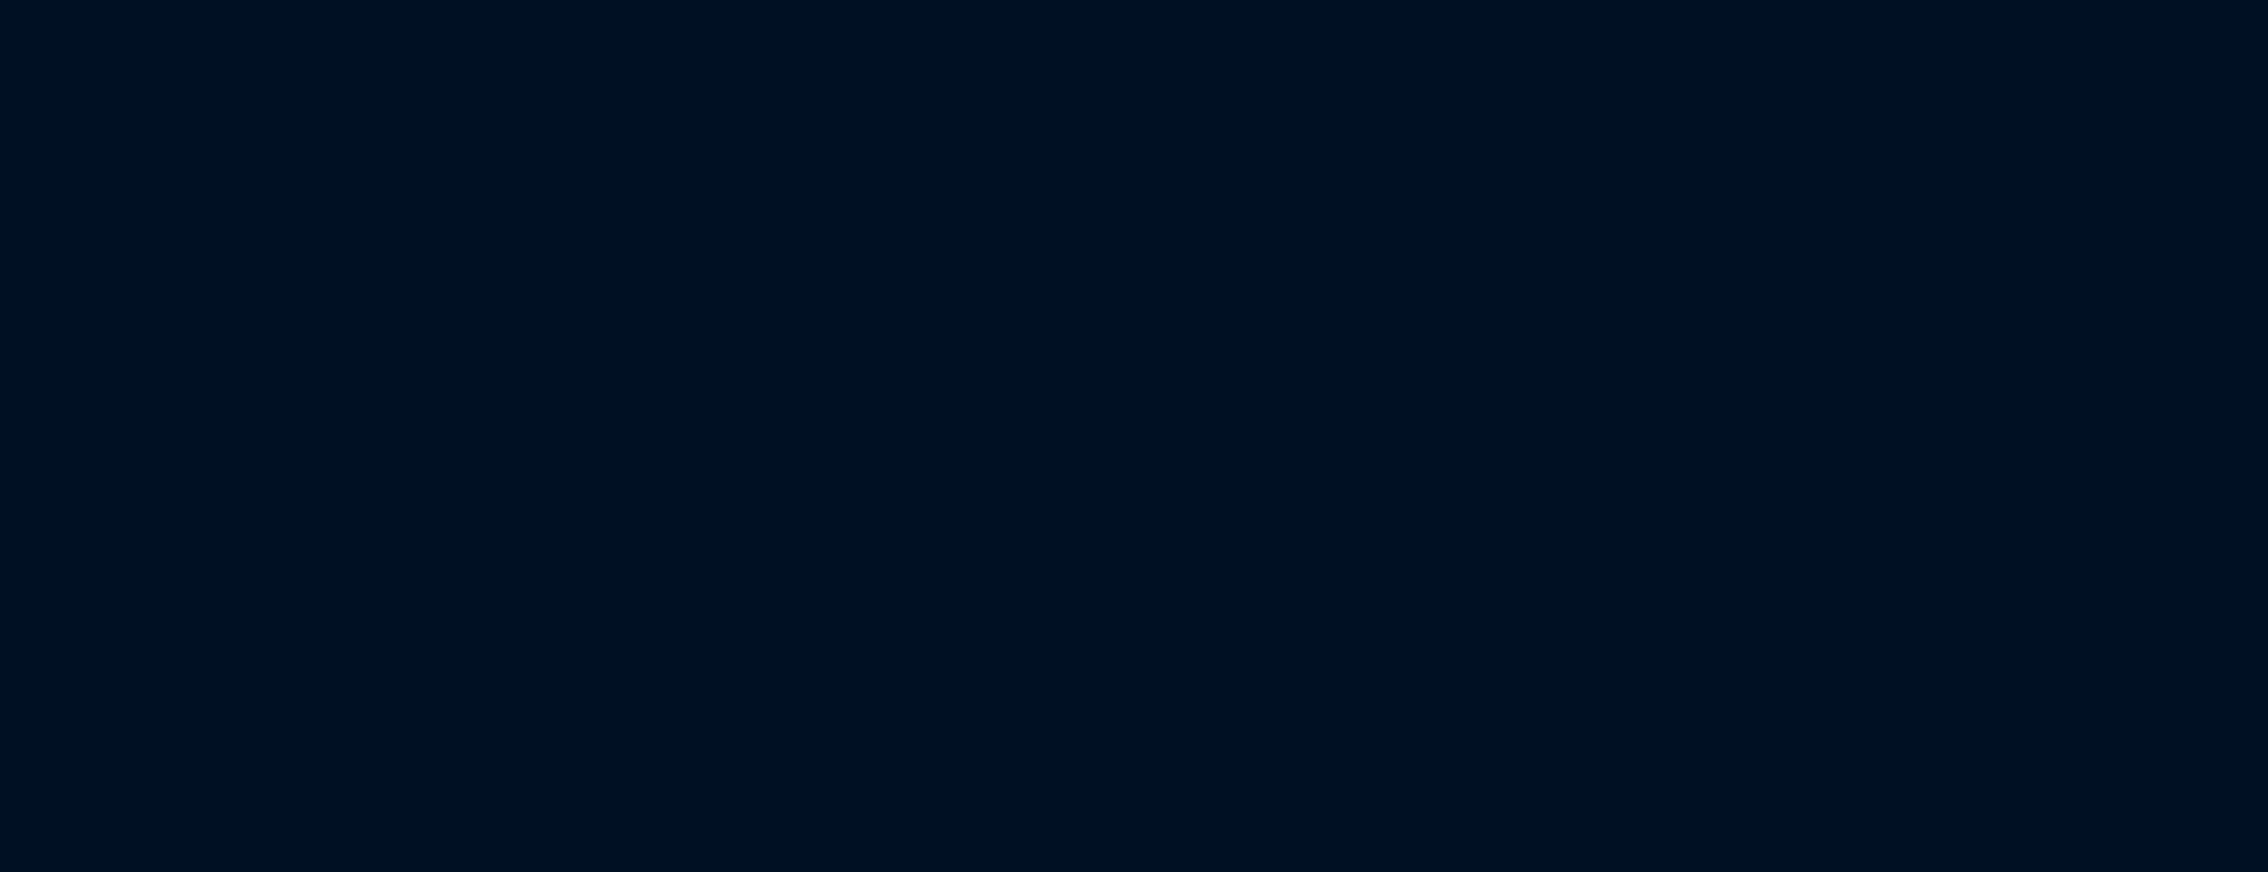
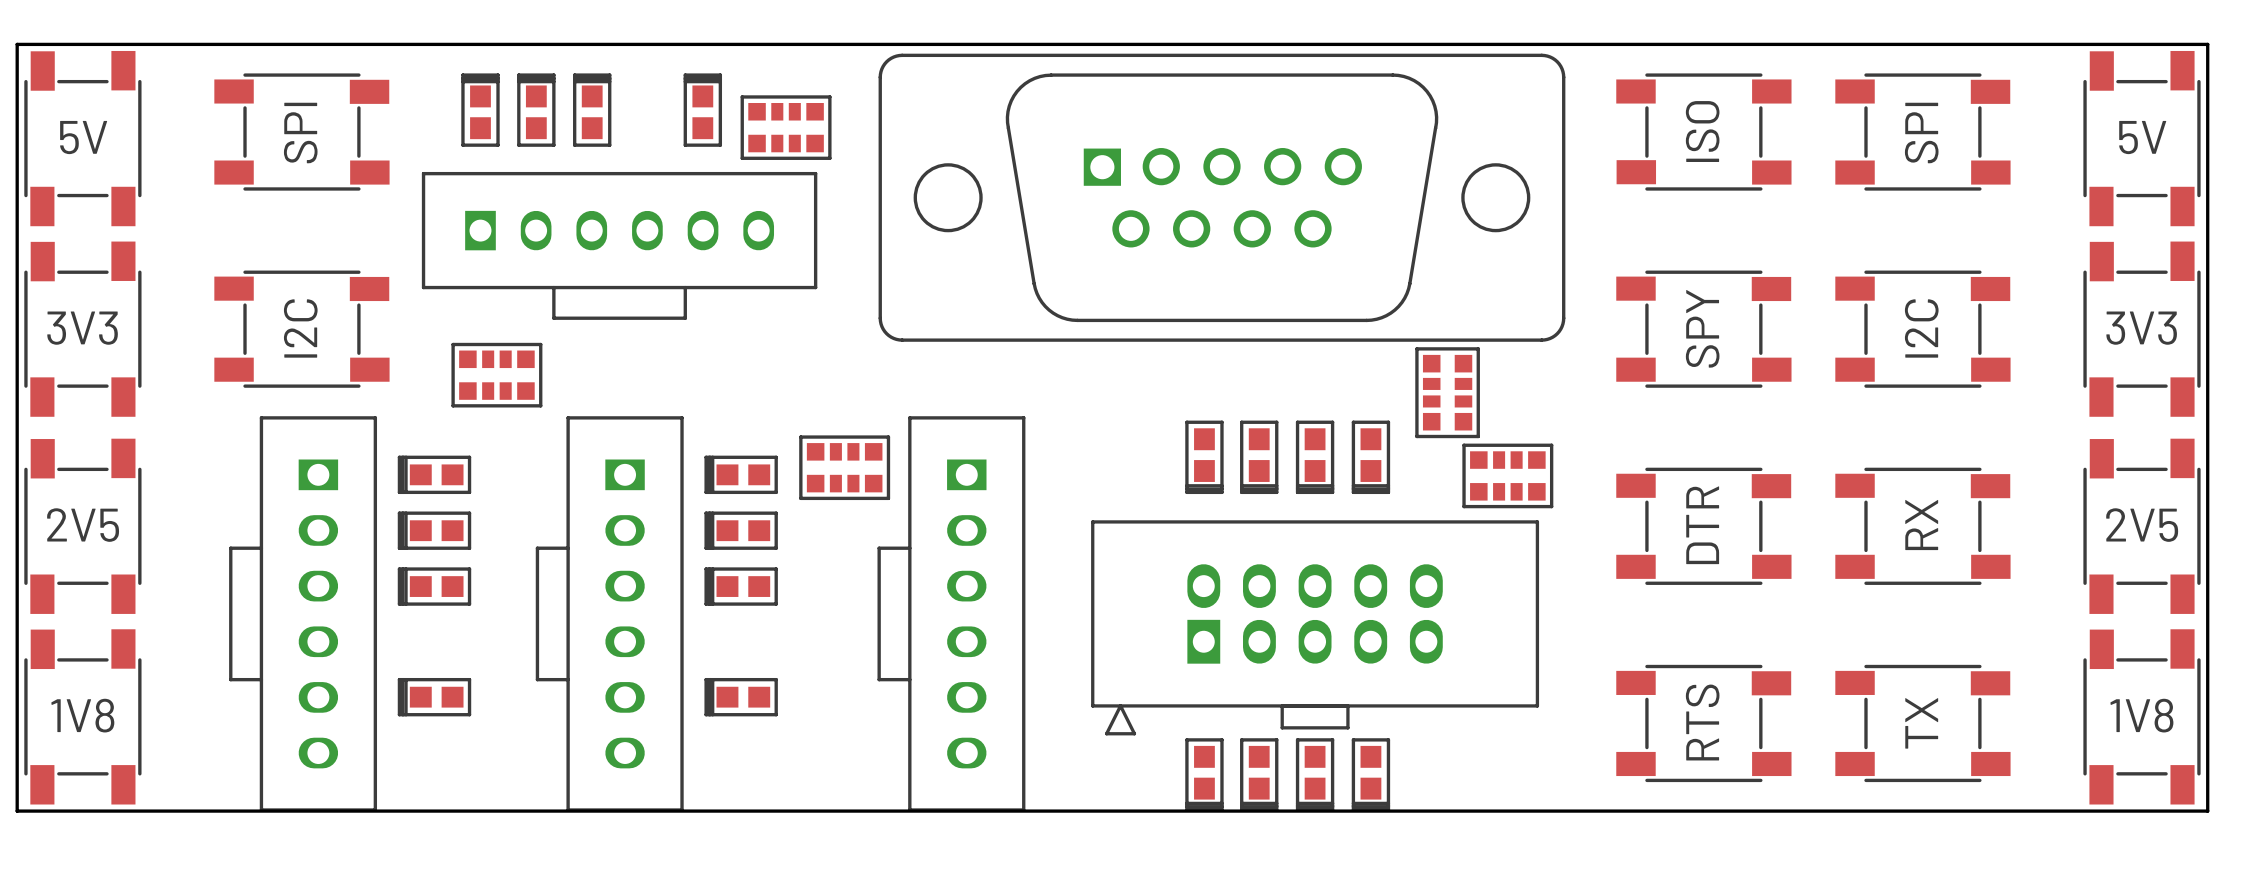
board edge: none -> (17, 44) (17, 811) (2207, 811) (2207, 44) (17, 44)
part: none -> (480, 110)
part: none -> (536, 110)
part: none -> (592, 110)
part: none -> (702, 110)
part: none -> (786, 127)
part: none -> SPI (301, 132)
part: none -> ISO (1703, 132)
part: none -> SPI (1922, 132)
part: none -> 5V (82, 138)
part: none -> 5V (2141, 138)
part: none -> (1221, 197)
part: none -> (619, 245)
part: none -> 3V3 (82, 329)
part: none -> I2C (301, 329)
part: none -> SPY (1703, 329)
part: none -> I2C (1922, 329)
part: none -> 3V3 (2141, 329)
part: none -> (496, 375)
part: none -> (1447, 392)
part: none -> (1204, 457)
part: none -> (1259, 457)
part: none -> (1315, 457)
part: none -> (1370, 457)
part: none -> (844, 467)
part: none -> (434, 474)
part: none -> (741, 474)
part: none -> (1507, 475)
part: none -> 2V5 (82, 526)
part: none -> DTR (1703, 526)
part: none -> RX (1922, 526)
part: none -> 2V5 (2141, 526)
part: none -> (434, 530)
part: none -> (741, 530)
part: none -> (434, 586)
part: none -> (741, 586)
part: none -> (303, 613)
part: none -> (609, 613)
part: none -> (951, 613)
part: none -> (1315, 627)
part: none -> (434, 697)
part: none -> (741, 697)
part: none -> 1V8 (82, 716)
part: none -> 1V8 (2141, 716)
part: none -> RTS (1703, 723)
part: none -> TX (1922, 723)
part: none -> (1204, 774)
part: none -> (1259, 774)
part: none -> (1315, 774)
part: none -> (1370, 774)

